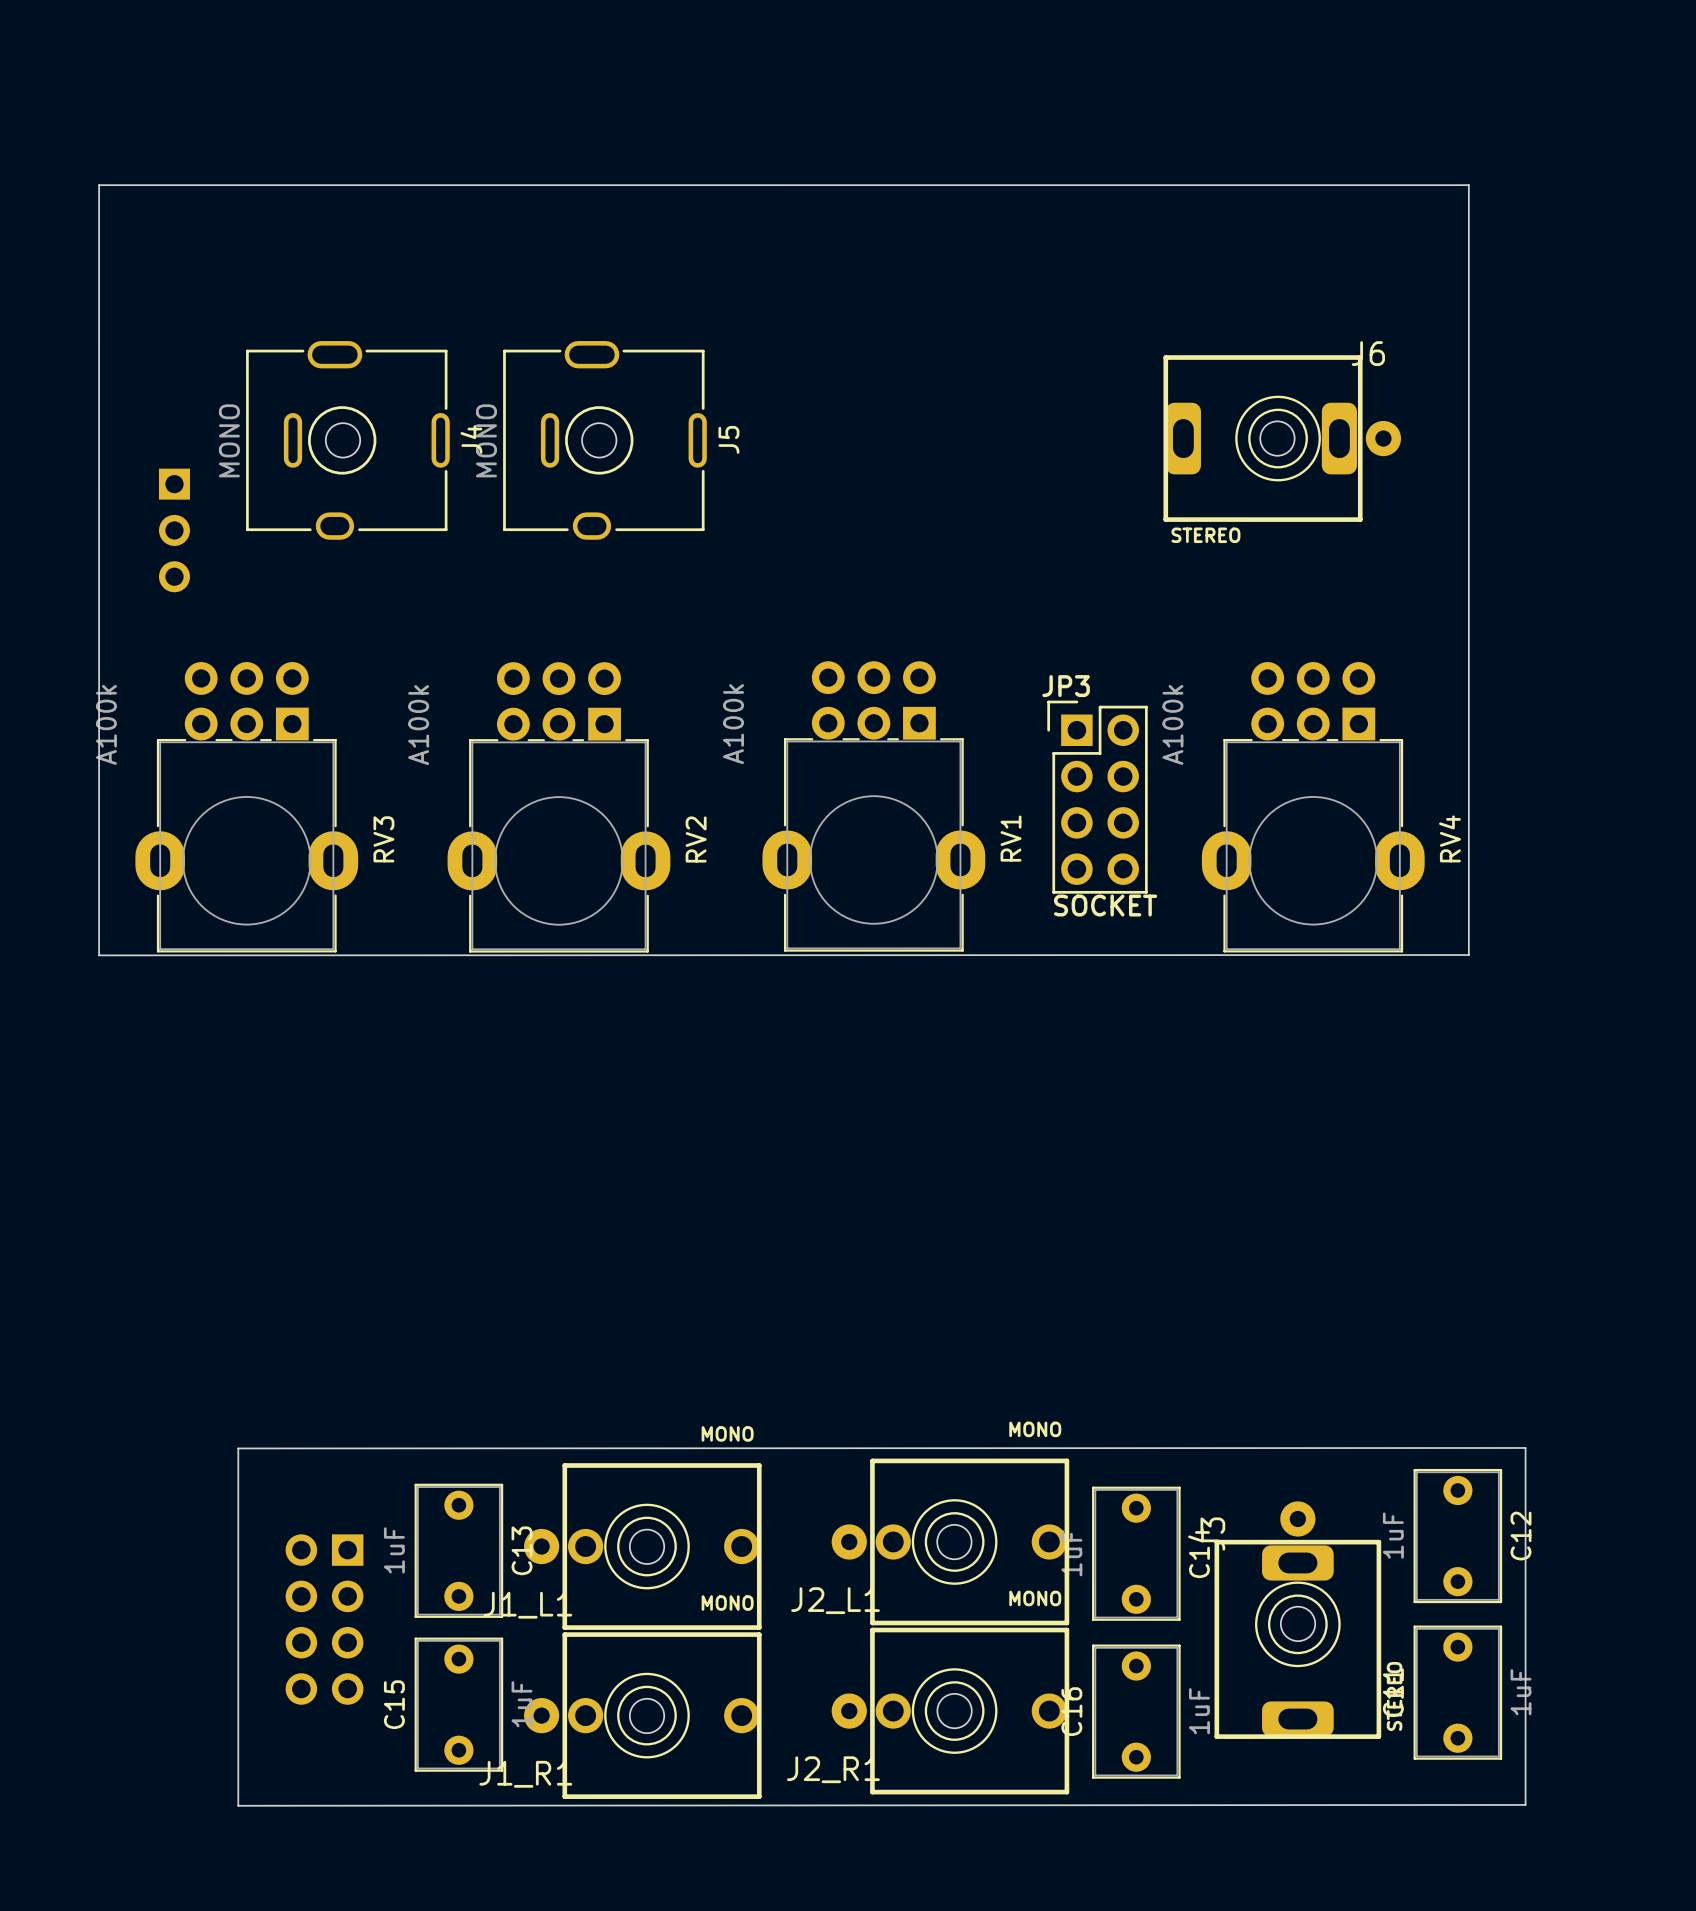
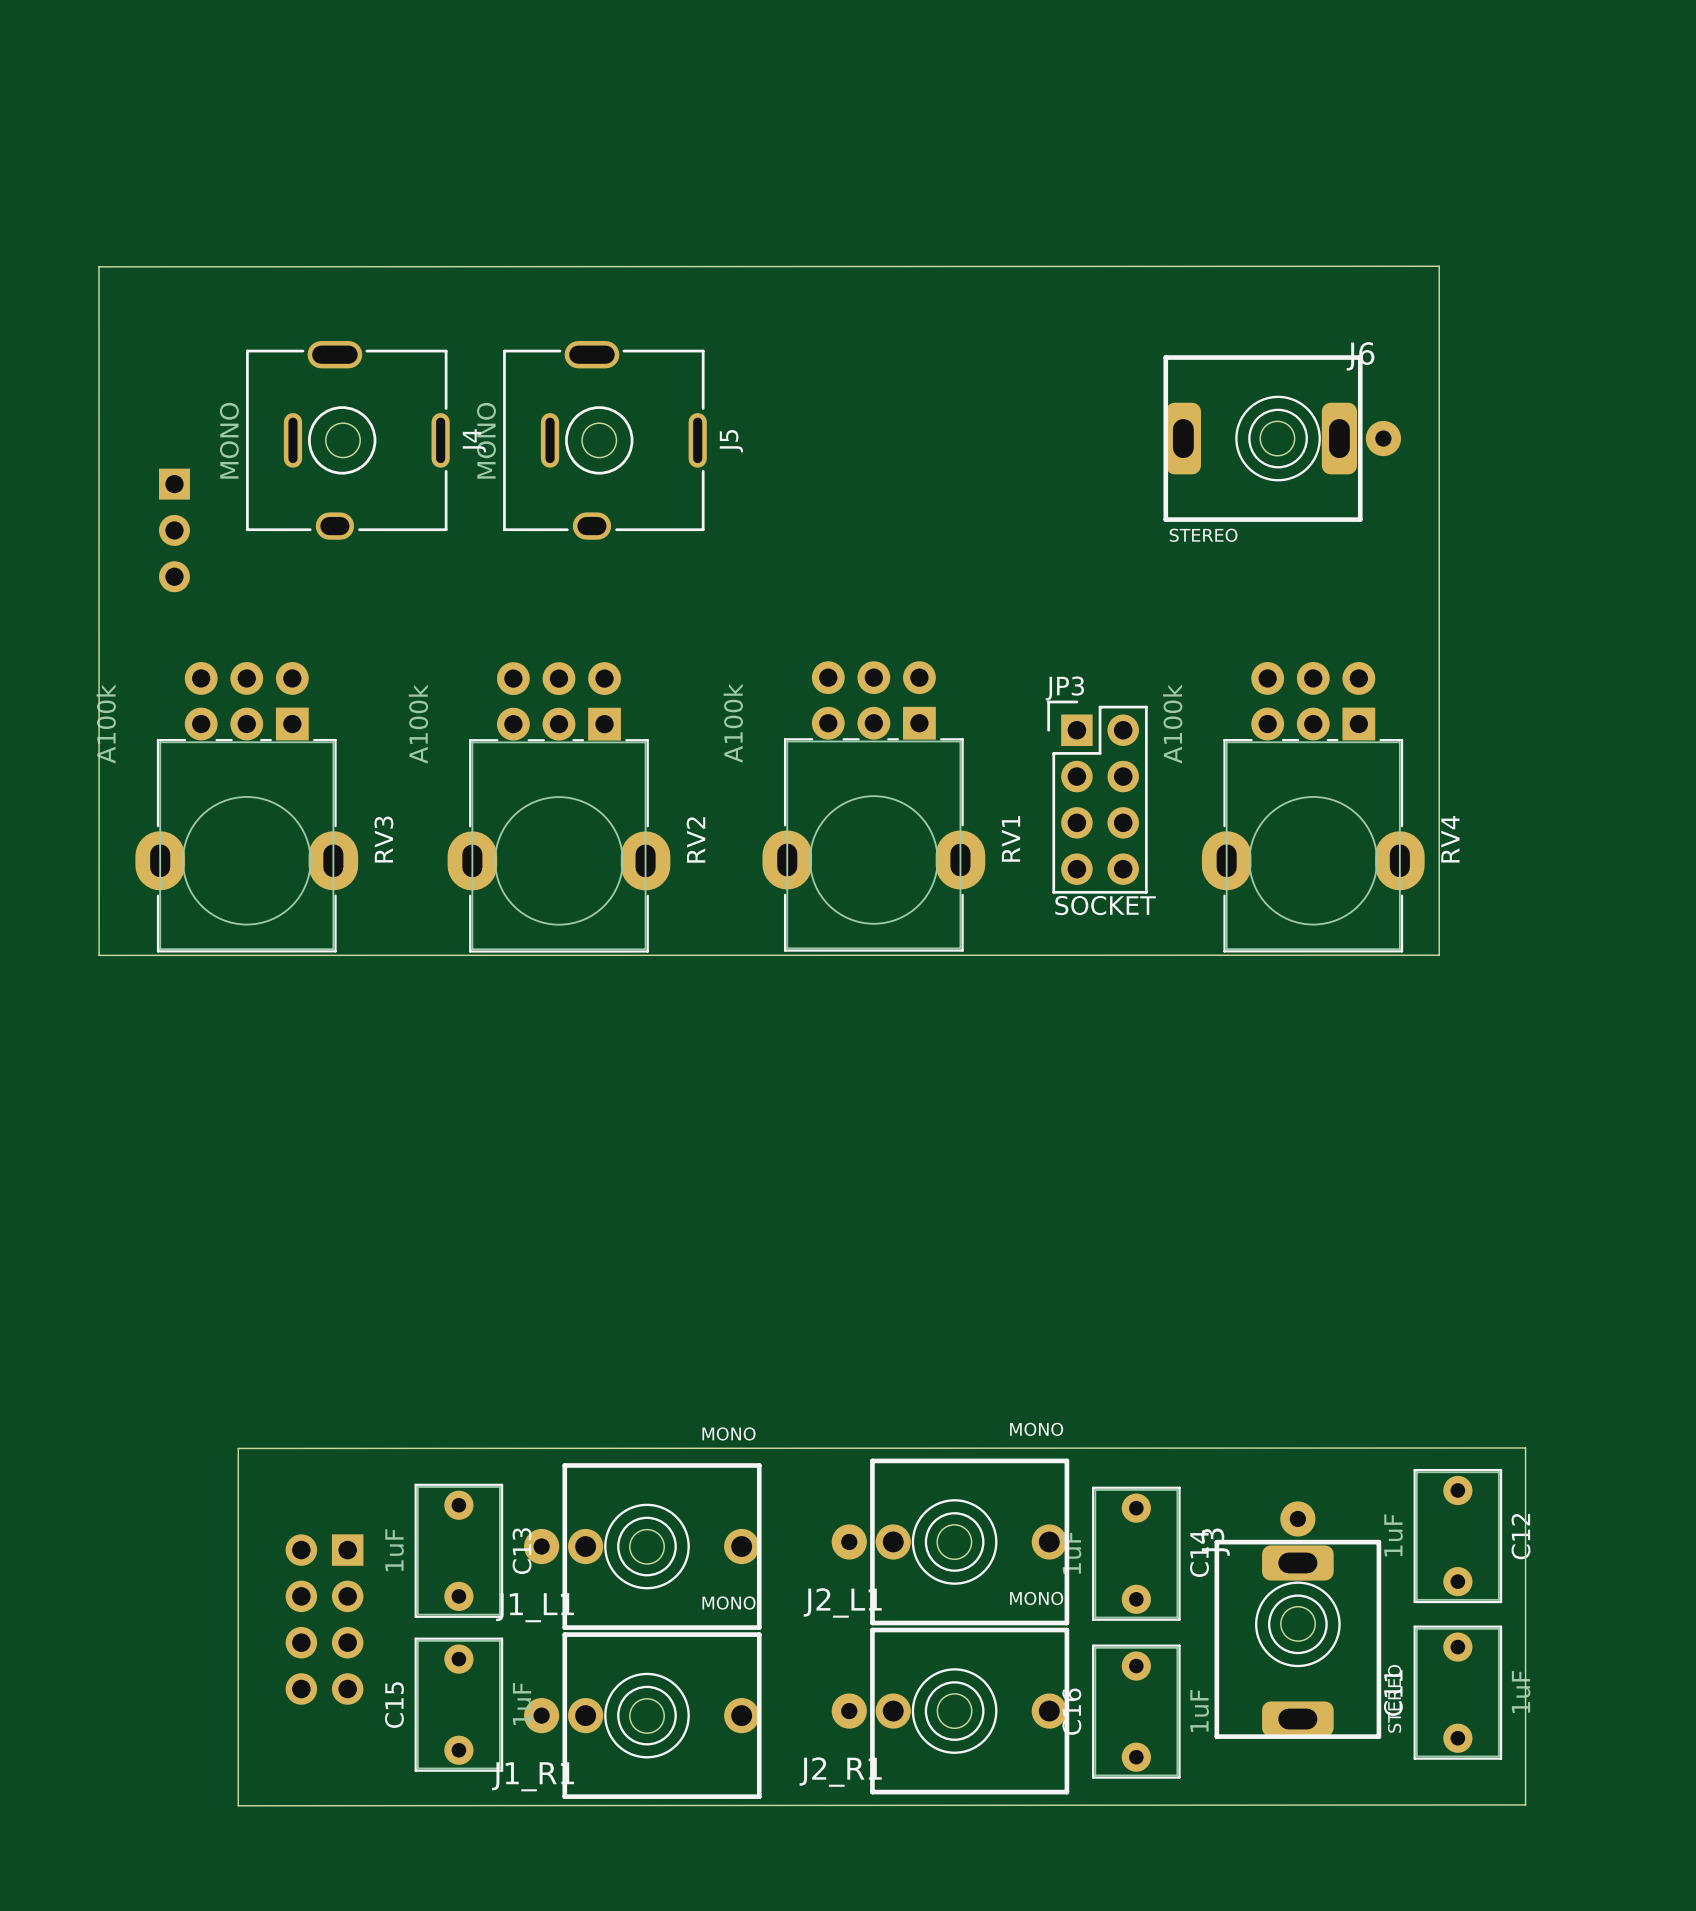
board edge: (99, 185) (1468, 185) (1468, 955) (99, 955) (99, 185) -> (1439, 266) (99, 266) (99, 955) (1439, 955) (1439, 266)

